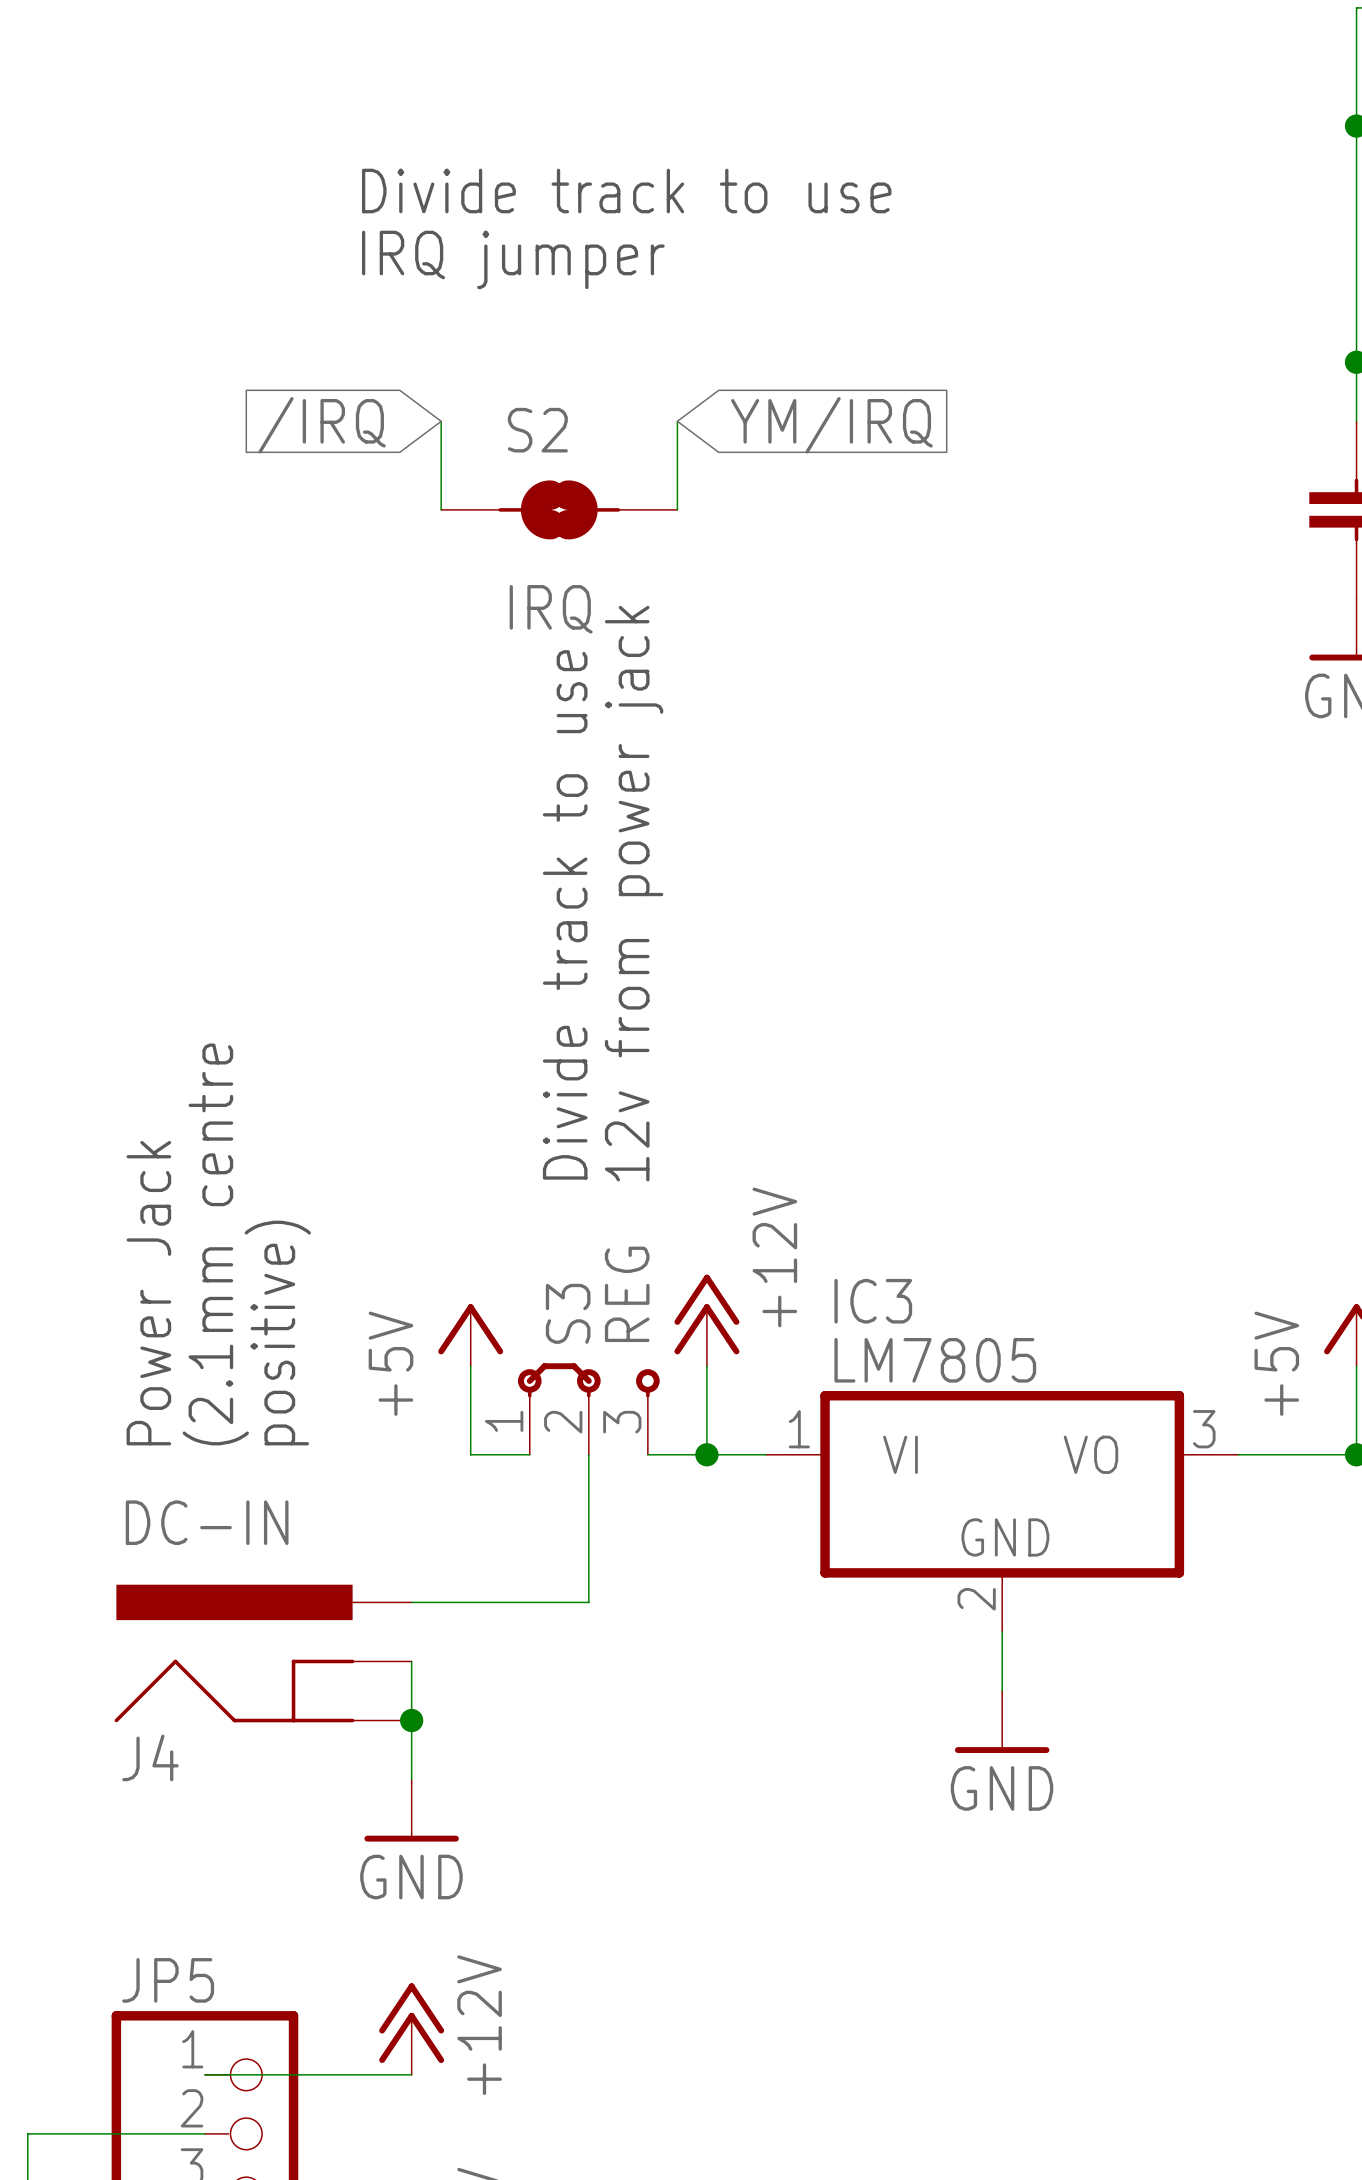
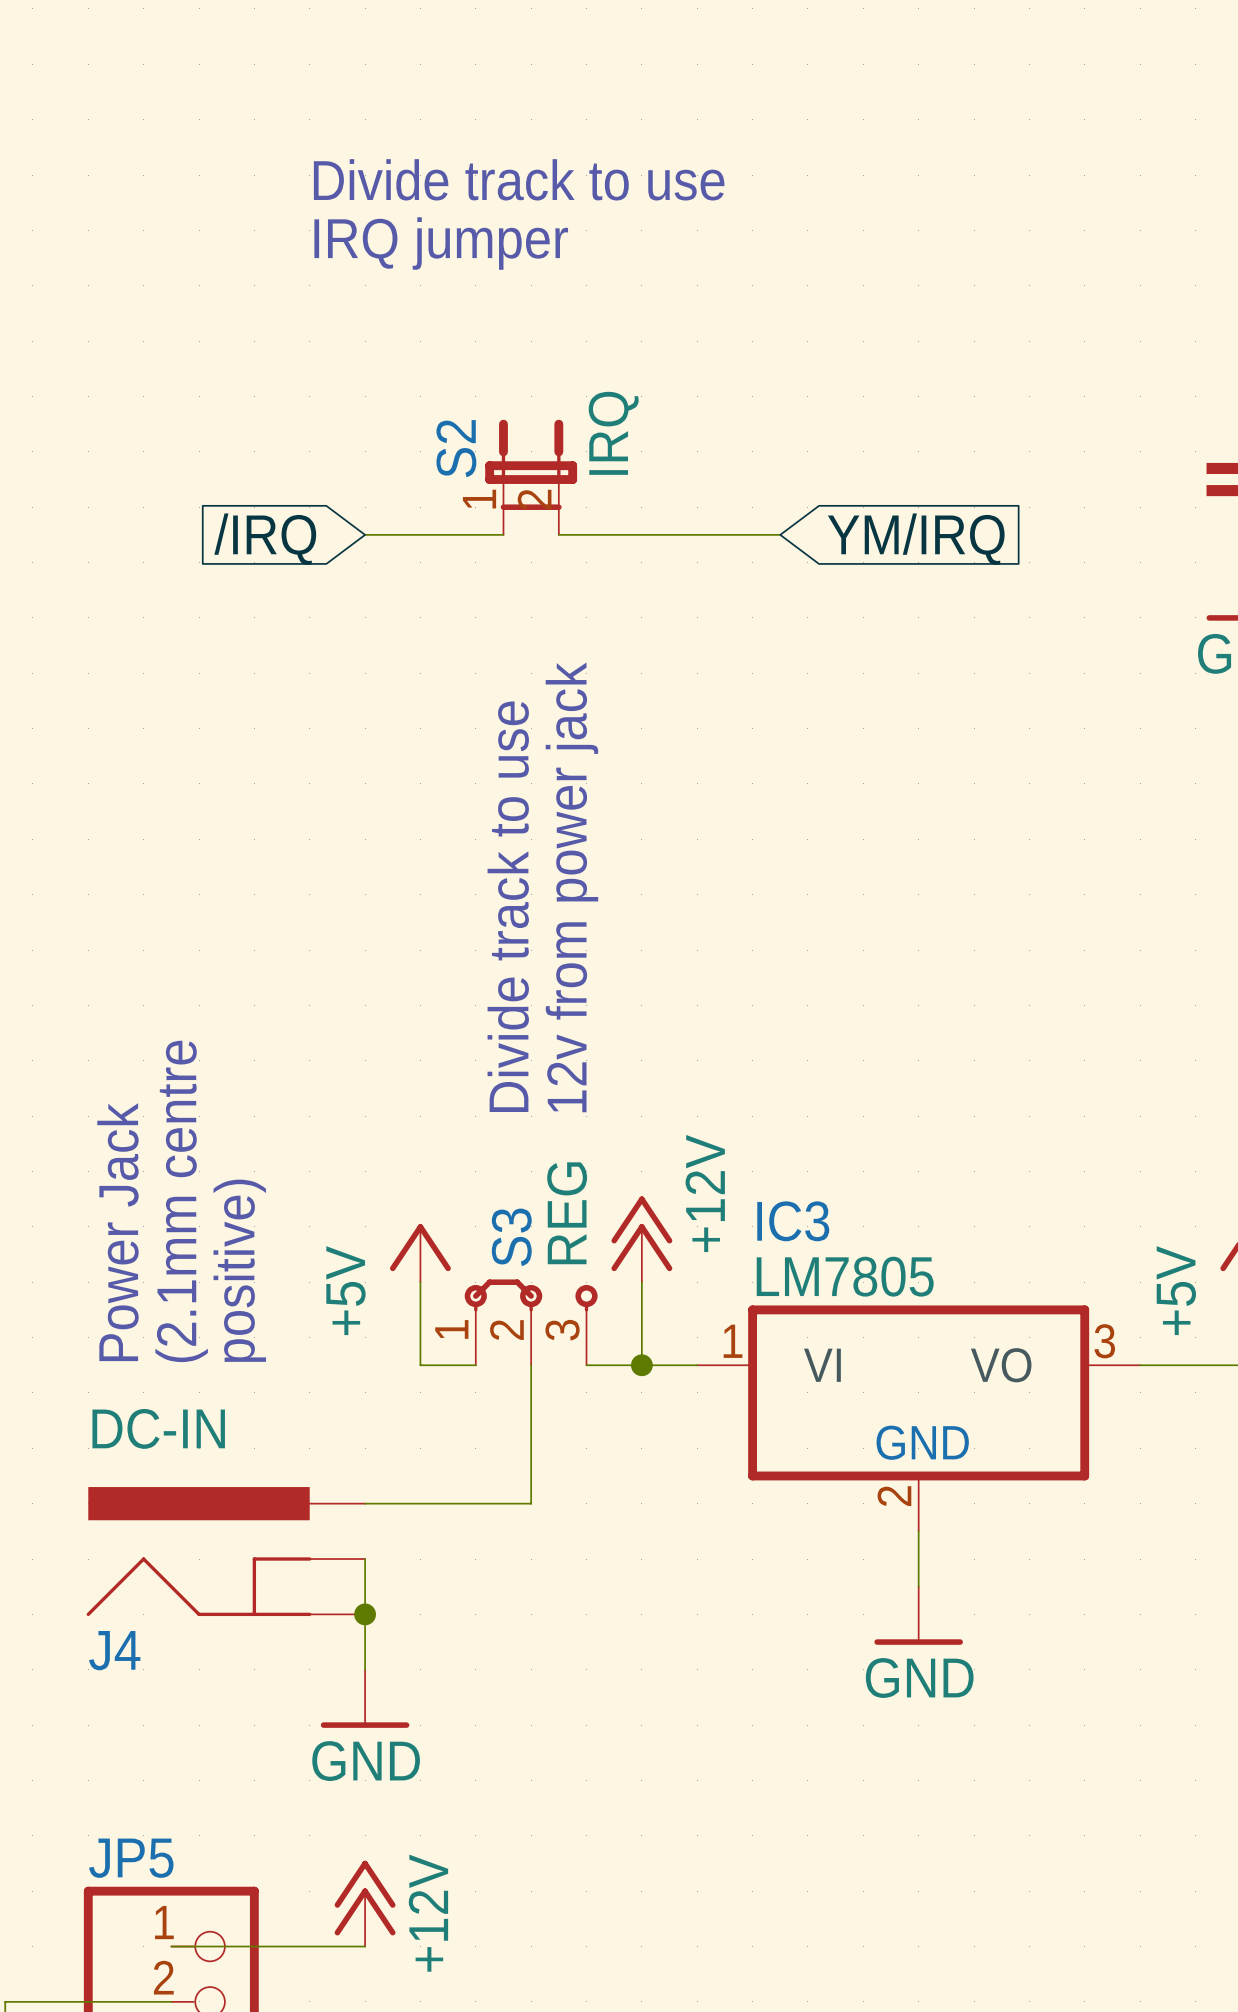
wire: (441, 421) (441, 509) -> none
wire: (677, 421) (677, 509) -> none
global label position: /IRQ (322, 425) -> /IRQ (265, 539)
global label position: YM/IRQ (831, 425) -> YM/IRQ (916, 539)
S2 name position: S2 (537, 430) -> S2 (456, 448)
S2 symbol: [441, 480, 678, 540] -> [485, 419, 578, 535]
wire: none -> (365, 534) (503, 534)
wire: none -> (558, 534) (780, 534)
S2 value position: IRQ (551, 609) -> IRQ (613, 433)

